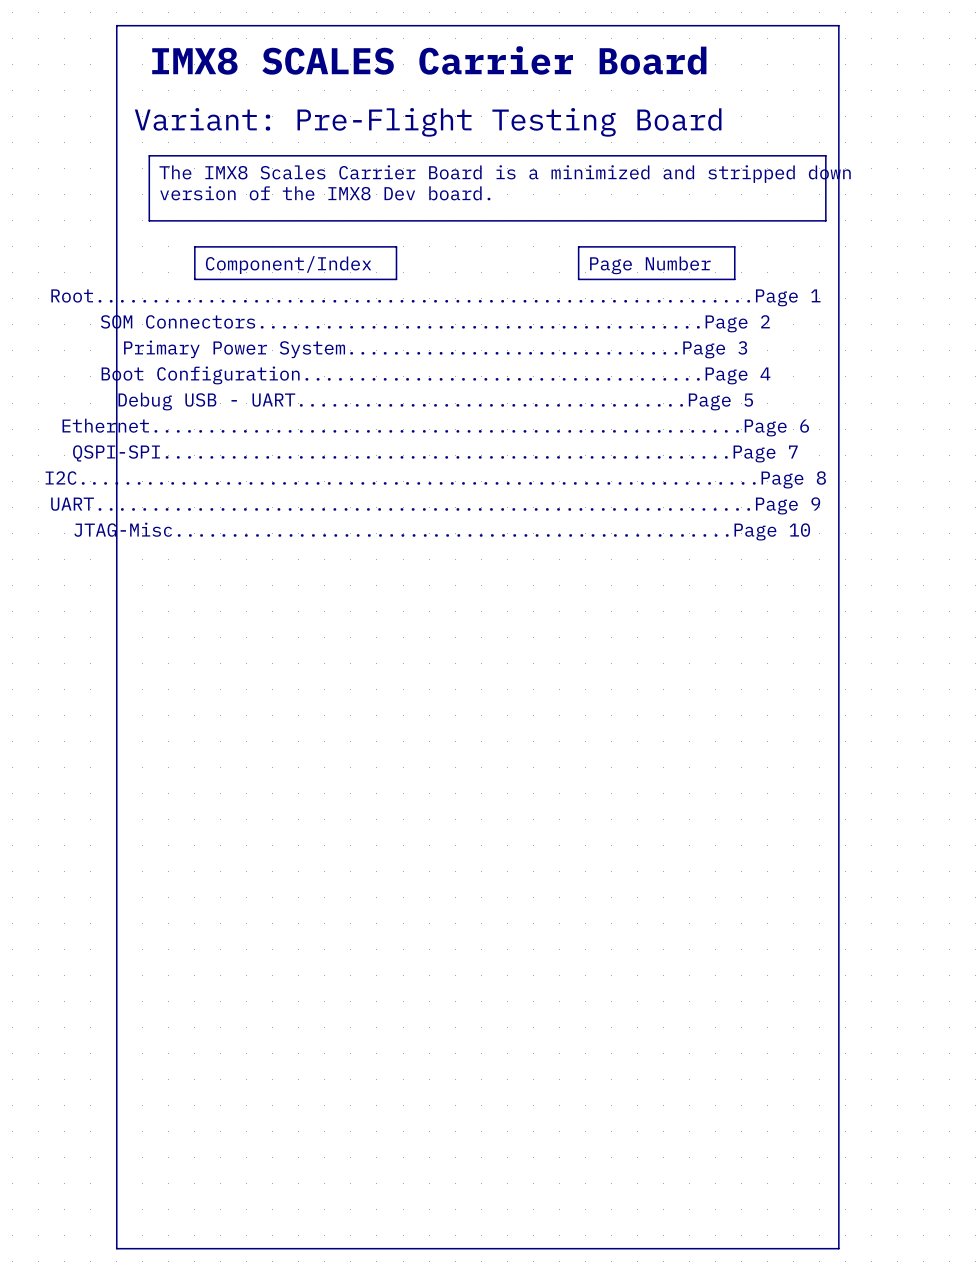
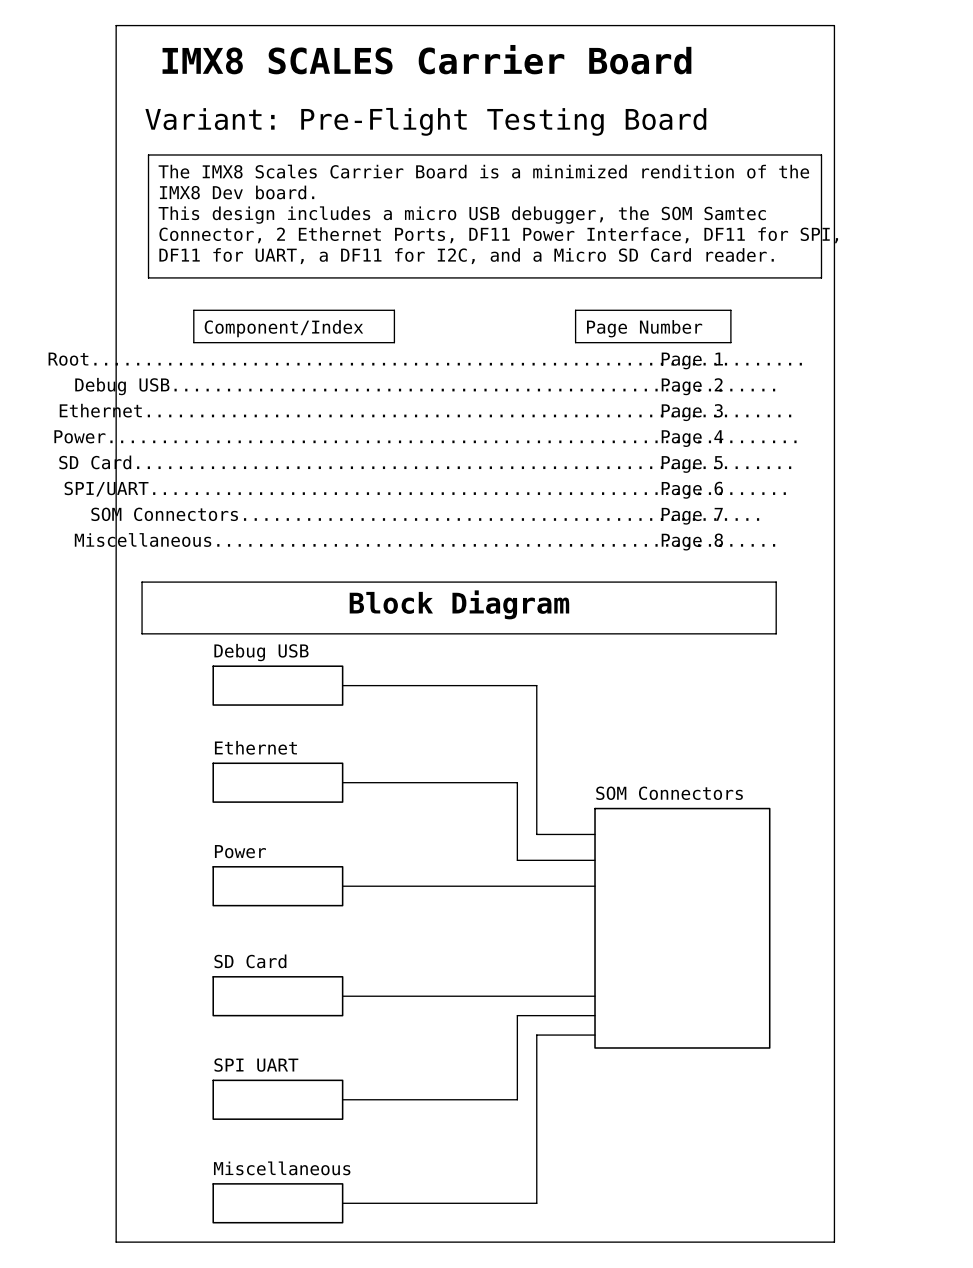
text: The IMX8 Scales Carrier Board is a minimized and stripped down (505, 174) -> The IMX8 Scales Carrier Board is a minimized rendition of the (483, 171)
text: version of the IMX8 Dev board. (325, 193) -> IMX8 Dev board. (237, 192)
text: none -> This design includes a micro USB debugger, the SOM Samtec (462, 215)
line: (149, 220) (825, 220) -> none
text: none -> Connector, 2 Ethernet Ports, DF11 Power Interface, DF11 for SPI, (498, 235)
text: none -> DF11 for UART, a DF11 for I2C, and a Micro SD Card reader. (466, 256)
text position: Component/Index (288, 265) -> Component/Index (283, 328)
text position: Page Number (650, 265) -> Page Number (644, 328)
line: (194, 279) (194, 246) (396, 246) (396, 279) -> (193, 277) (148, 277) (148, 219)
line: none -> (394, 277) (575, 277)
line: (578, 279) (578, 246) (734, 246) (734, 279) -> (821, 219) (821, 277) (730, 277)
text: Root...........................................................Page 1 (435, 297) -> none
line: none -> (193, 310) (394, 310) (394, 342) (193, 342) (193, 310)
line: none -> (575, 310) (730, 310) (730, 342) (575, 342) (575, 310)
text: SOM Connectors........................................Page 2 (435, 323) -> none
text: Primary Power System..............................Page 3 (435, 349) -> none
text: none -> Root................................................................... (425, 359)
text: none -> Page 1 (692, 360)
text: Boot Configuration....................................Page 4 (435, 375) -> none
text: none -> Page 2 (692, 386)
text: Debug USB - UART...................................Page 5 (435, 401) -> Debug USB......................................................... (425, 386)
text: none -> Ethernet............................................................. (425, 410)
text: none -> Page 3 (692, 412)
text: Ethernet.....................................................Page 6 (435, 427) -> none
text: none -> Power................................................................. (425, 436)
text: none -> Page 4 (692, 438)
text: QSPI-SPI...................................................Page 7 (435, 453) -> none
text: none -> SD Card.............................................................. (425, 462)
text: none -> Page 5 (692, 464)
text: I2C.............................................................Page 8 (435, 479) -> none
text: none -> SPI/UART............................................................ (425, 489)
text: none -> Page 6 (692, 490)
text: UART...........................................................Page 9 (435, 505) -> none
text: none -> SOM Connectors................................................. (425, 514)
text: none -> Page 7 (692, 516)
text: JTAG-Misc..................................................Page 10 (442, 531) -> none
text: none -> Miscellaneous..................................................... (425, 540)
text: none -> Page 8 (692, 542)
line: none -> (142, 582) (776, 582) (776, 633) (142, 633) (142, 582)
text: none -> Block Diagram (459, 604)
sheet Debug USB: none -> (277, 685)
wire: none -> (342, 685) (536, 685) (536, 834) (595, 834)
sheet Ethernet: none -> (277, 782)
wire: none -> (342, 782) (517, 782) (517, 860) (595, 860)
sheet Power: none -> (277, 886)
wire: none -> (342, 886) (595, 886)
sheet SOM Connectors: none -> (682, 928)
sheet SD Card: none -> (277, 996)
wire: none -> (342, 996) (595, 996)
wire: none -> (595, 1015) (517, 1015) (517, 1099) (342, 1099)
wire: none -> (595, 1035) (536, 1035) (536, 1203) (342, 1203)
sheet SPI UART: none -> (277, 1099)
sheet Miscellaneous: none -> (277, 1203)

